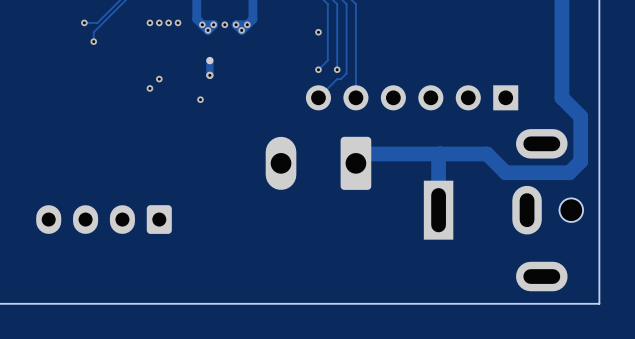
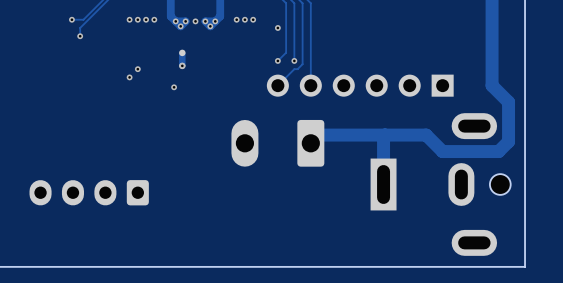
via: none -> (236, 19)
via: none -> (244, 19)
via: none -> (253, 19)

